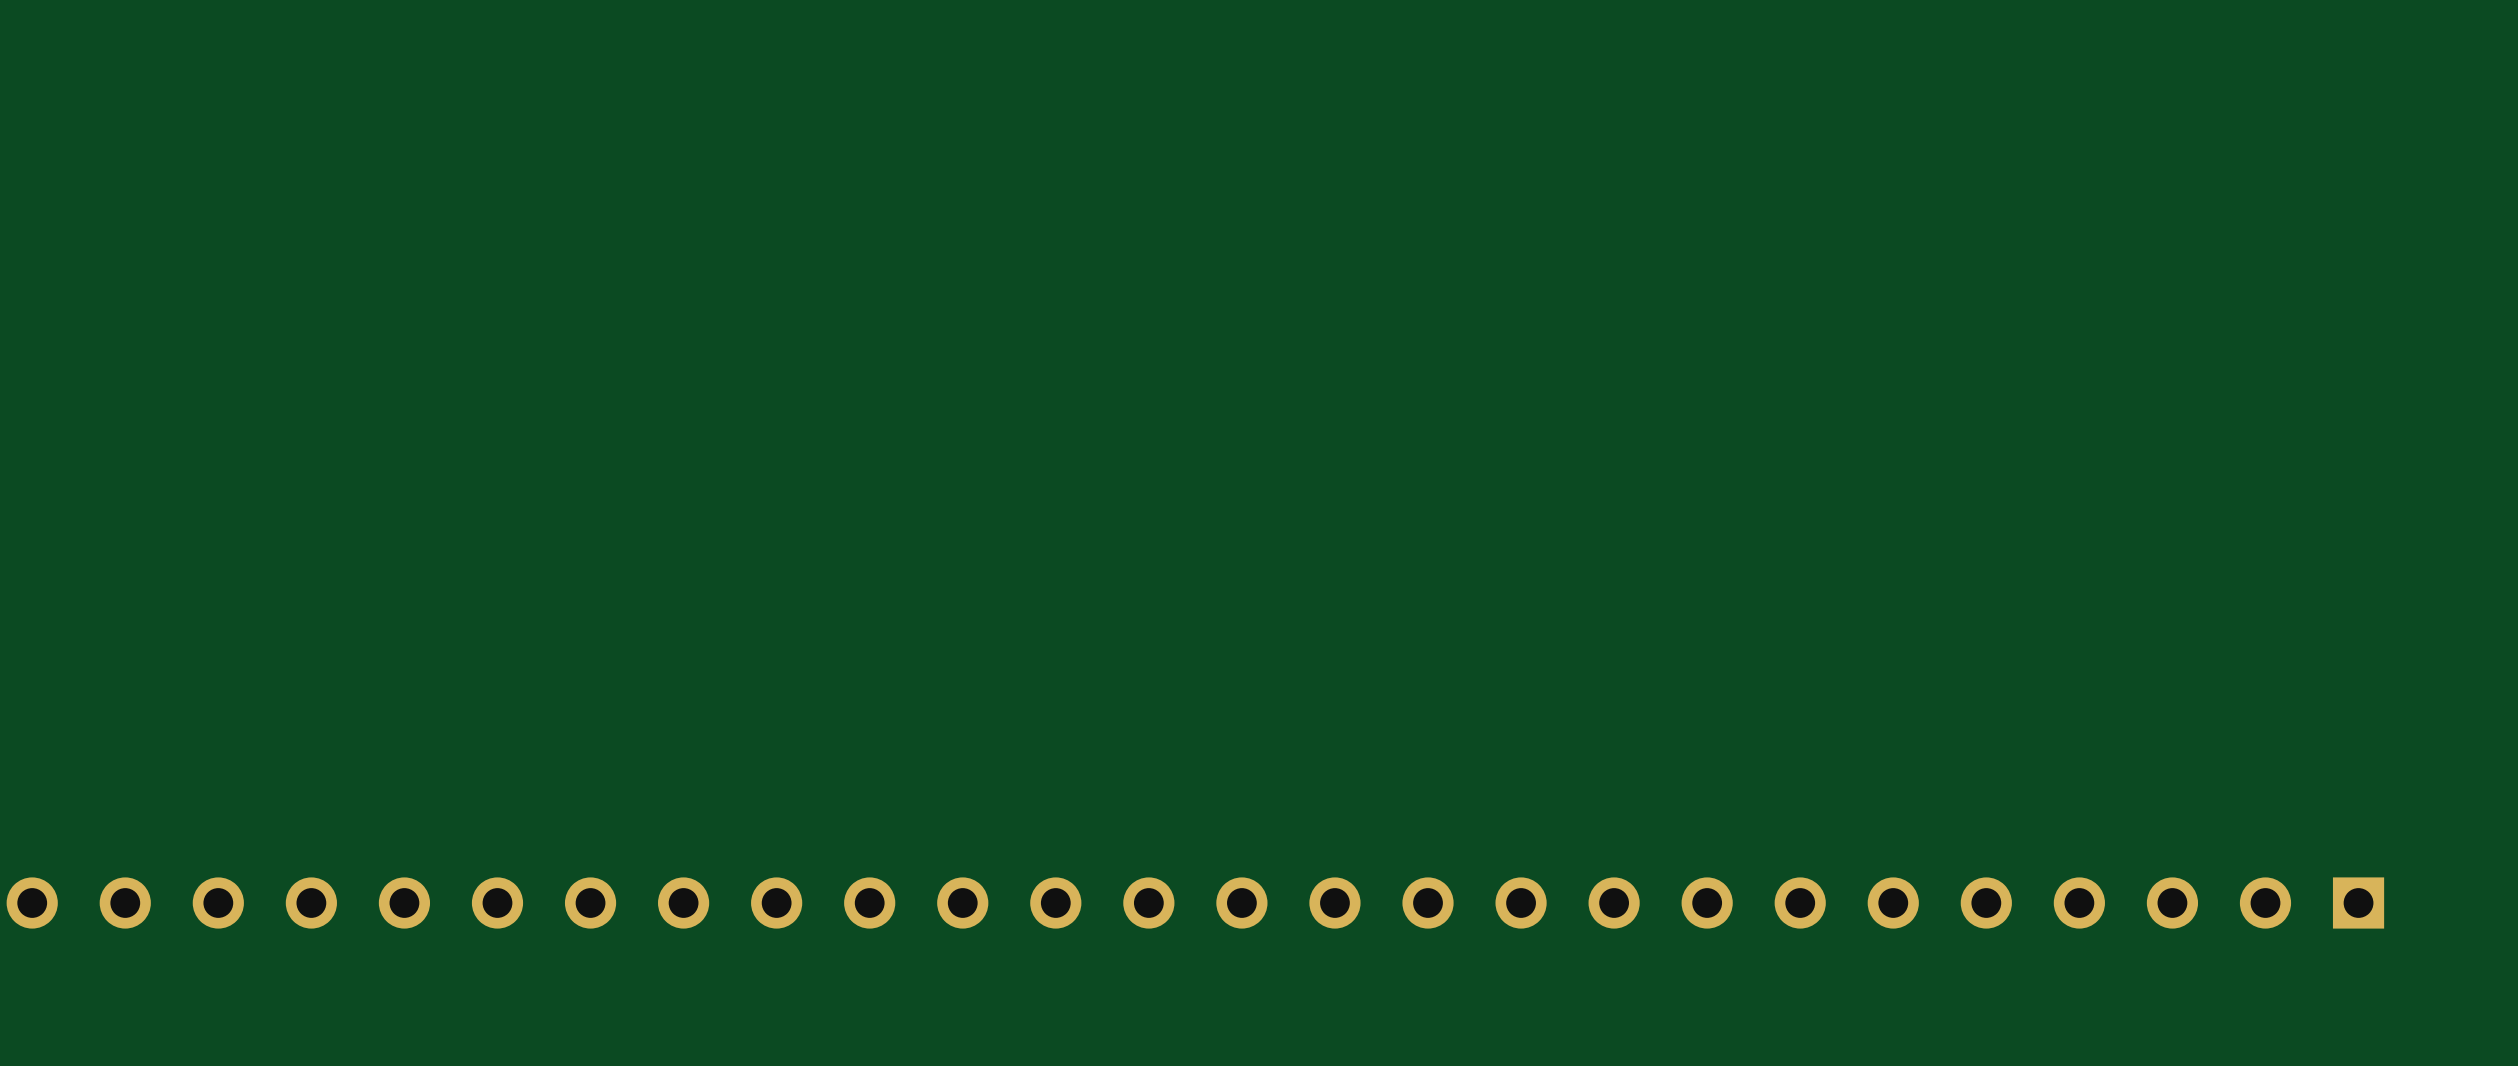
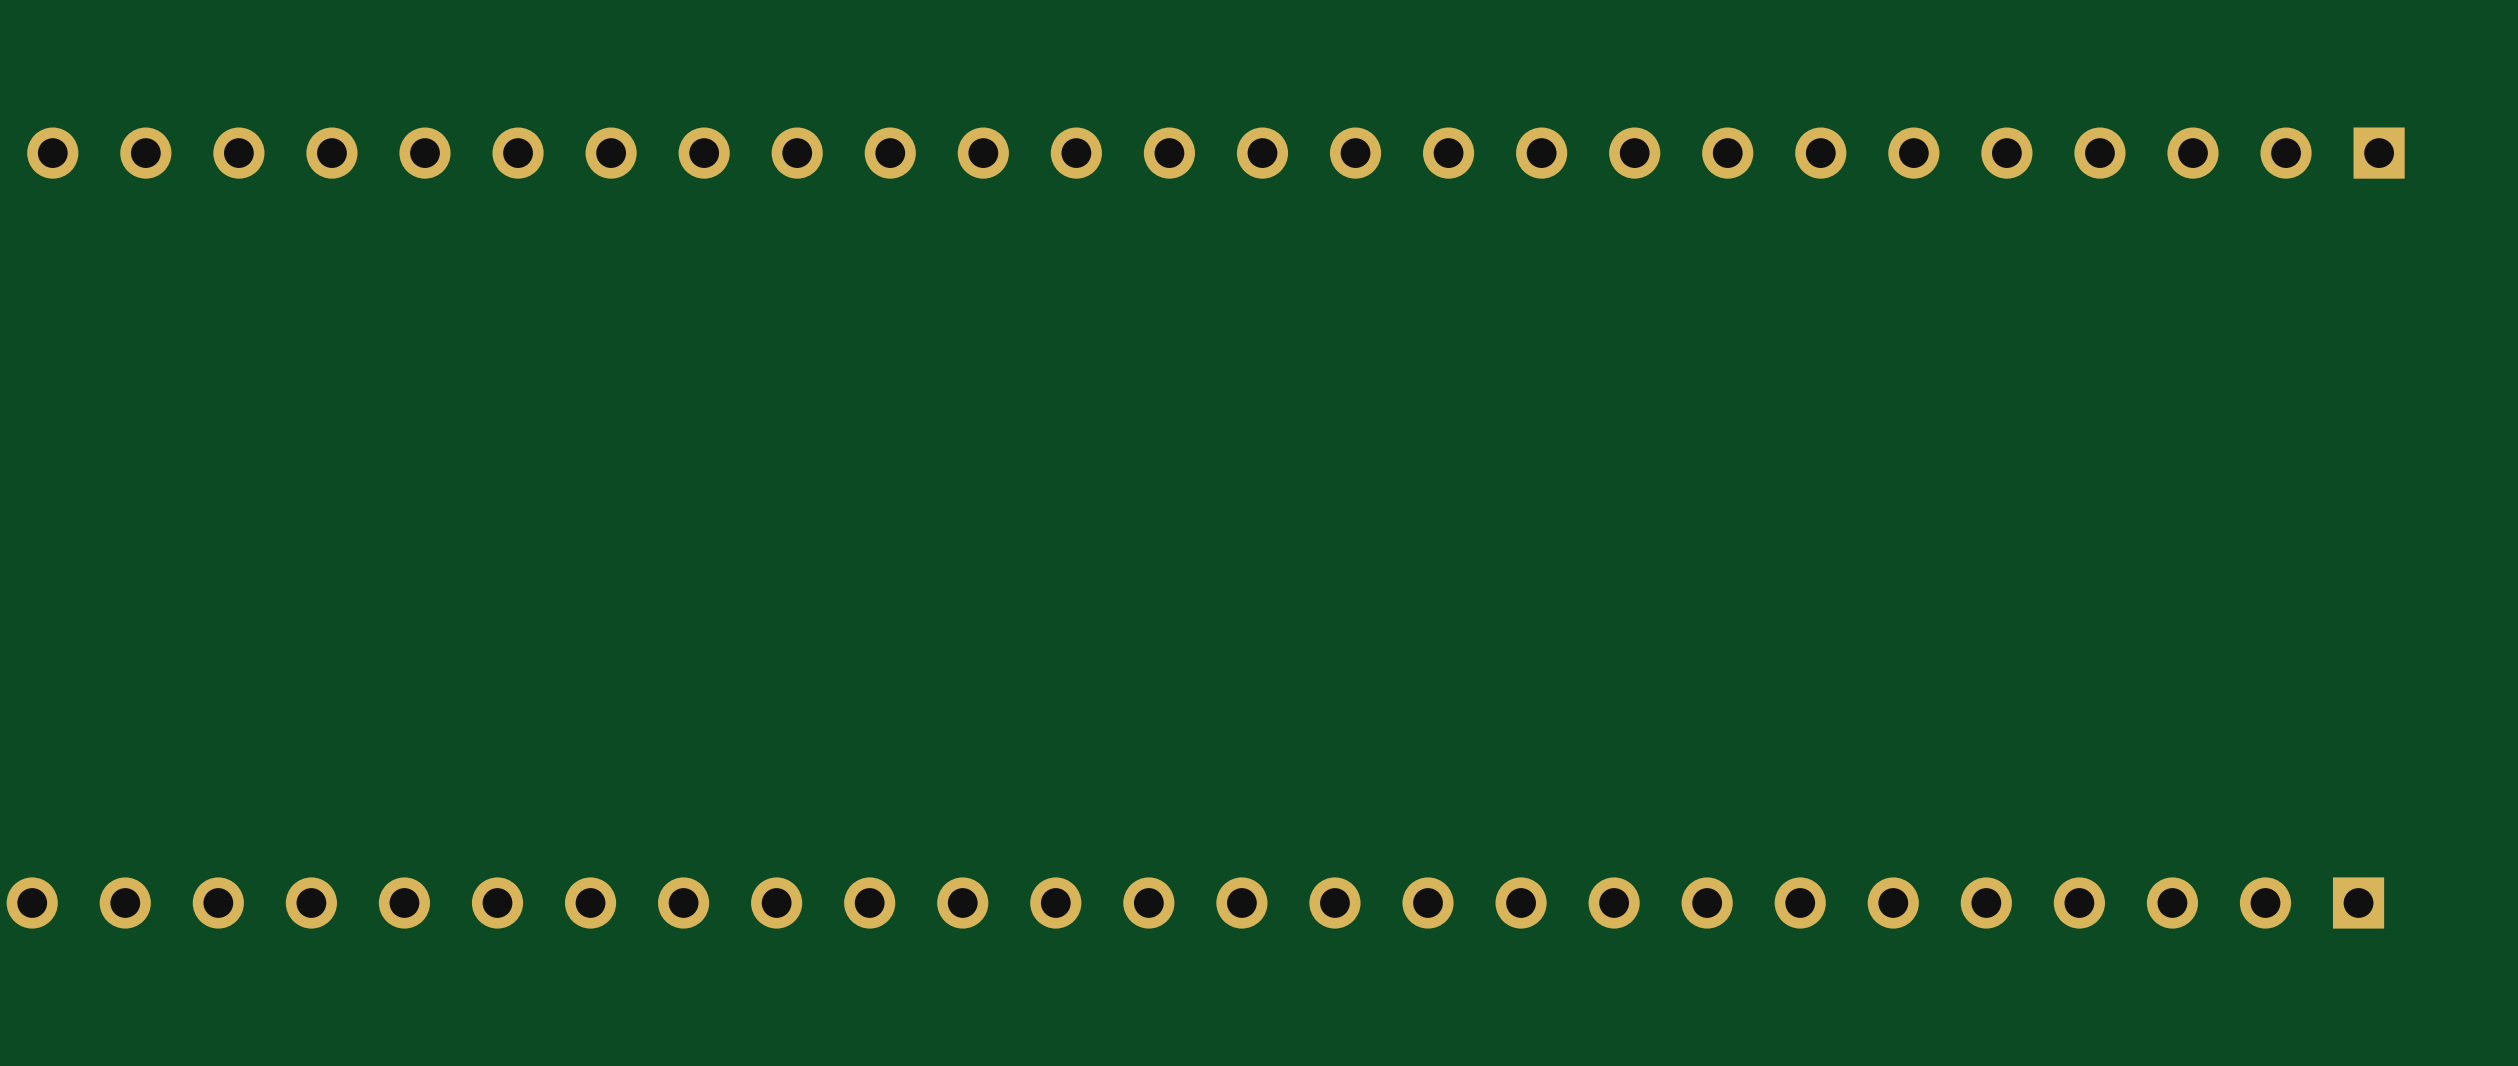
part: none -> (1215, 153)

